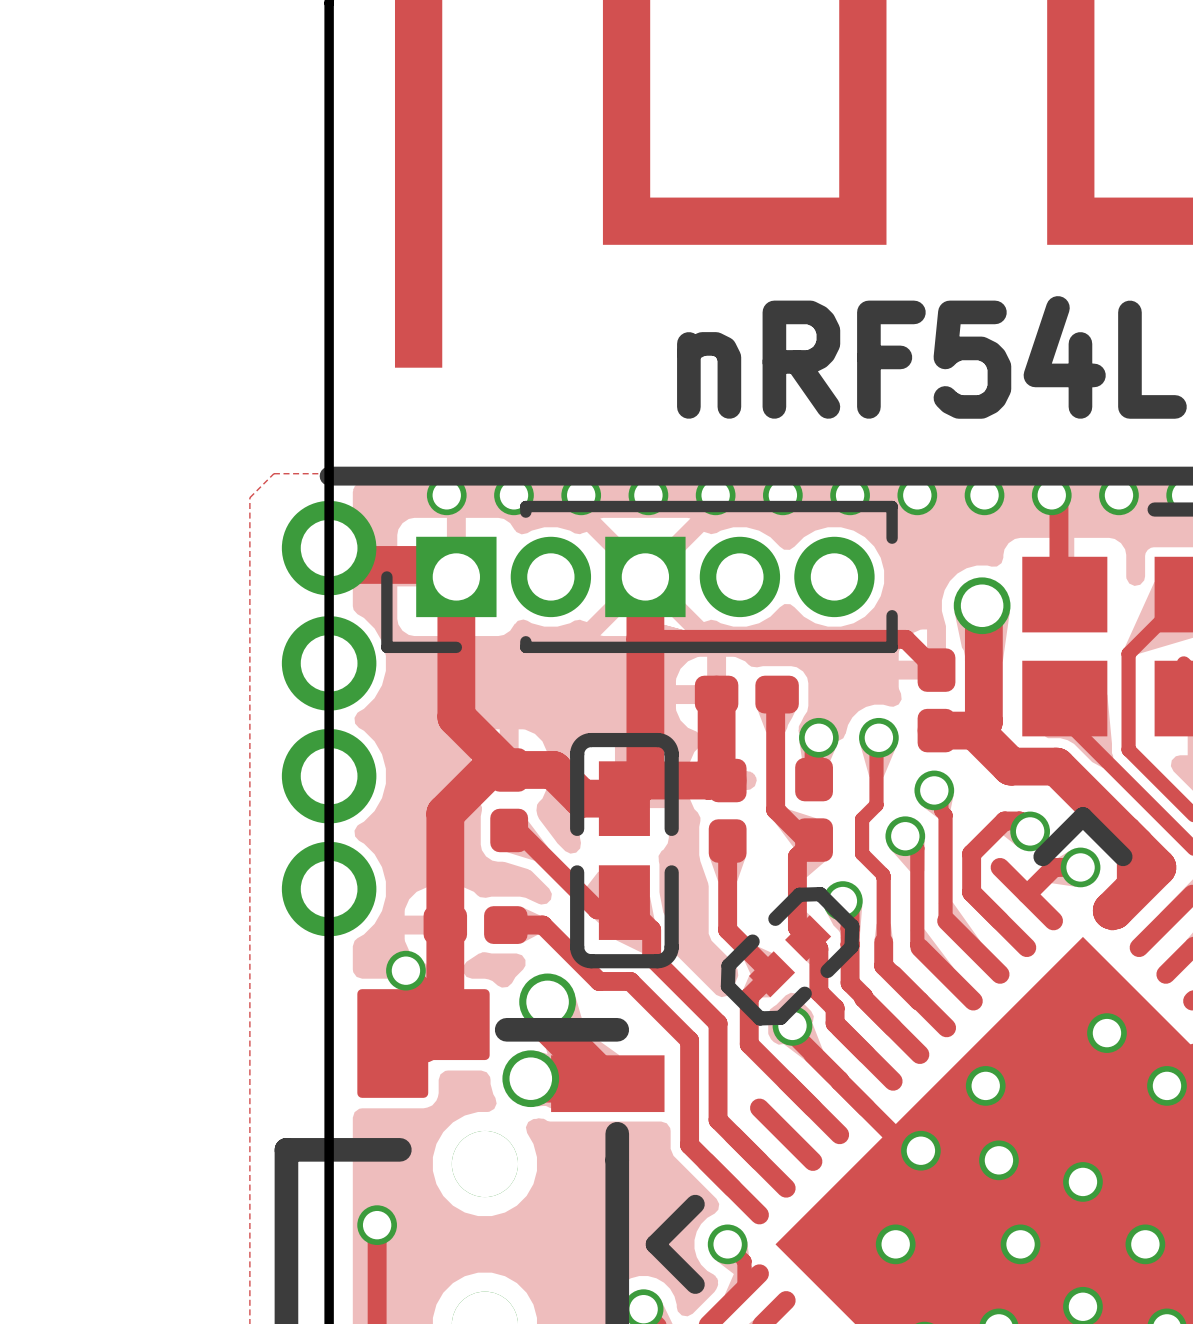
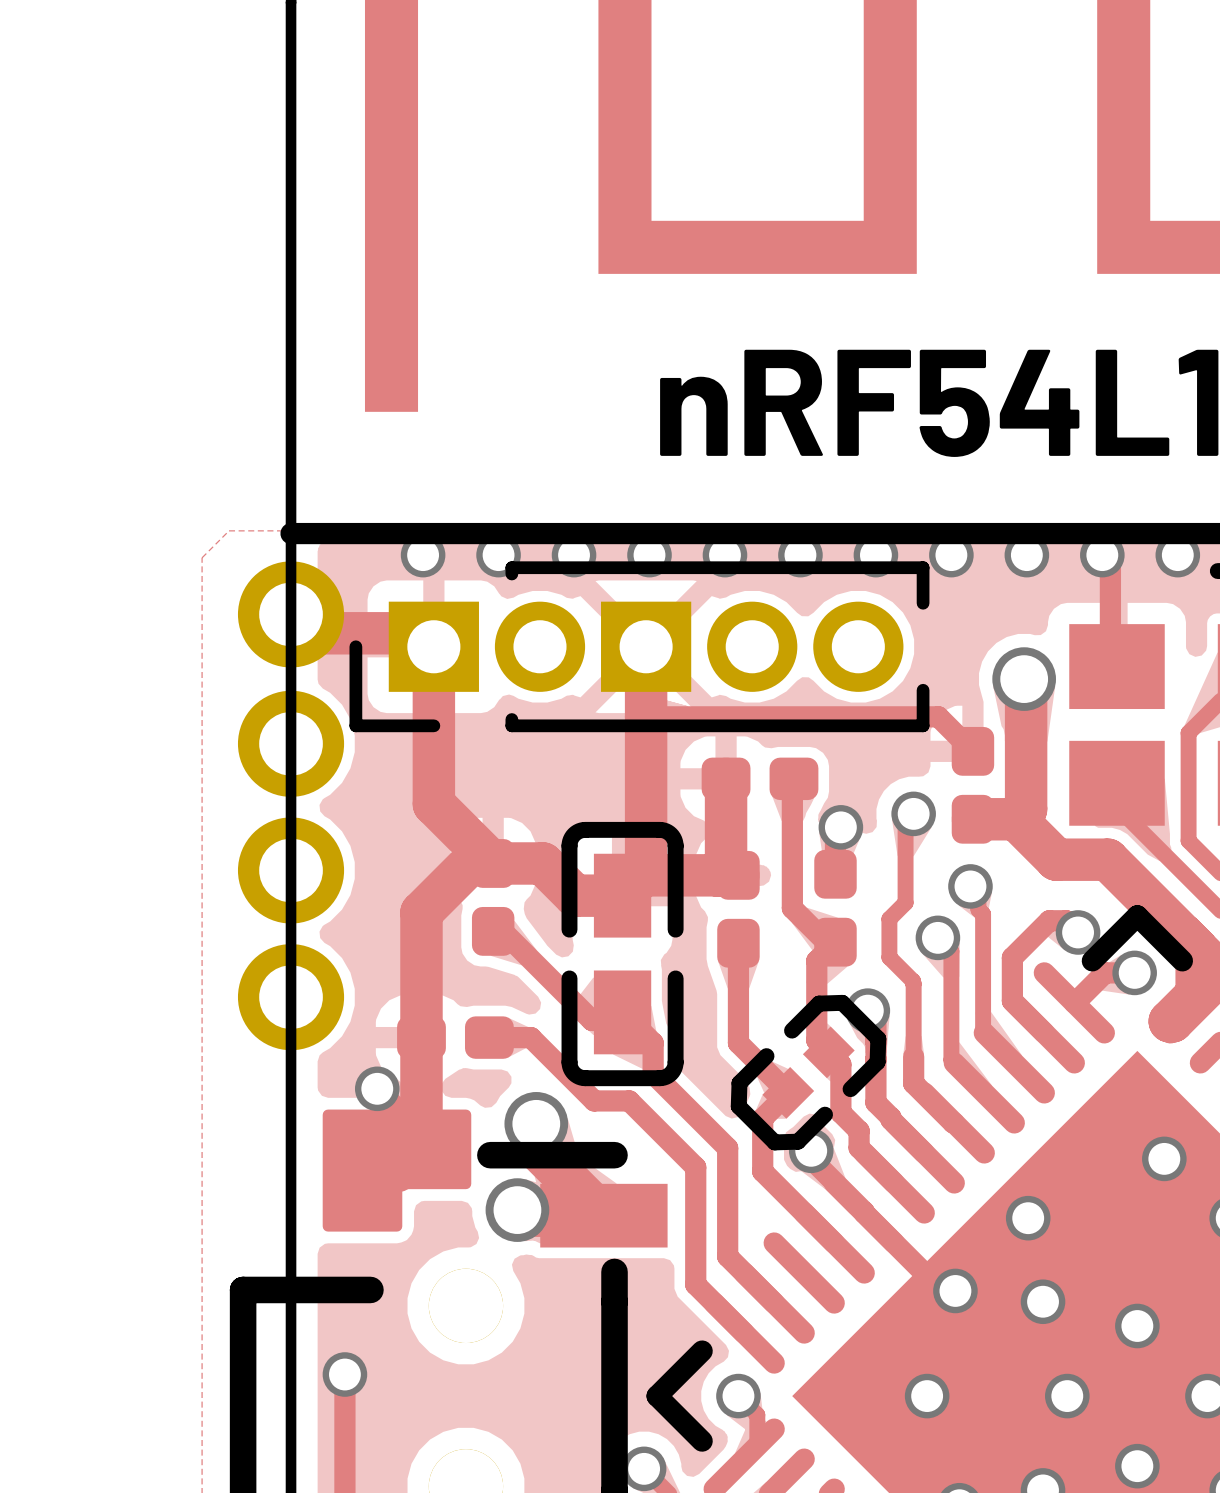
via position: (878, 737) -> (913, 813)

